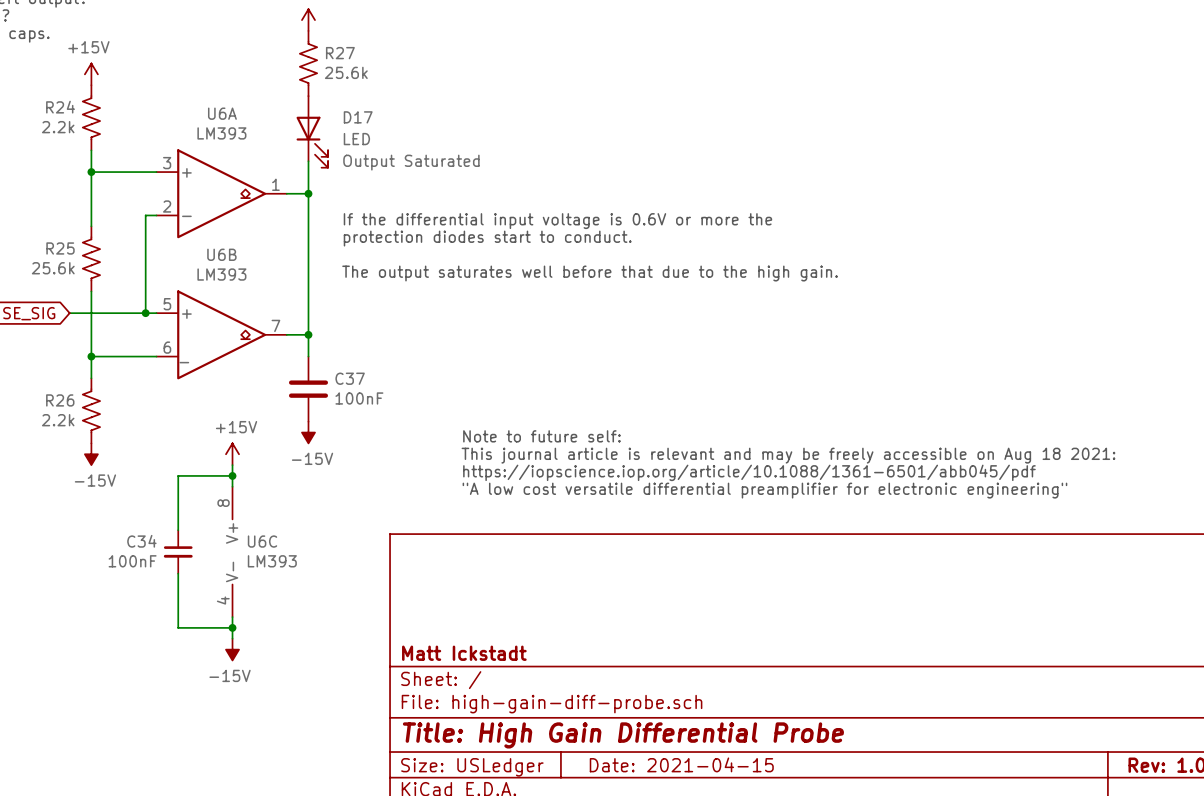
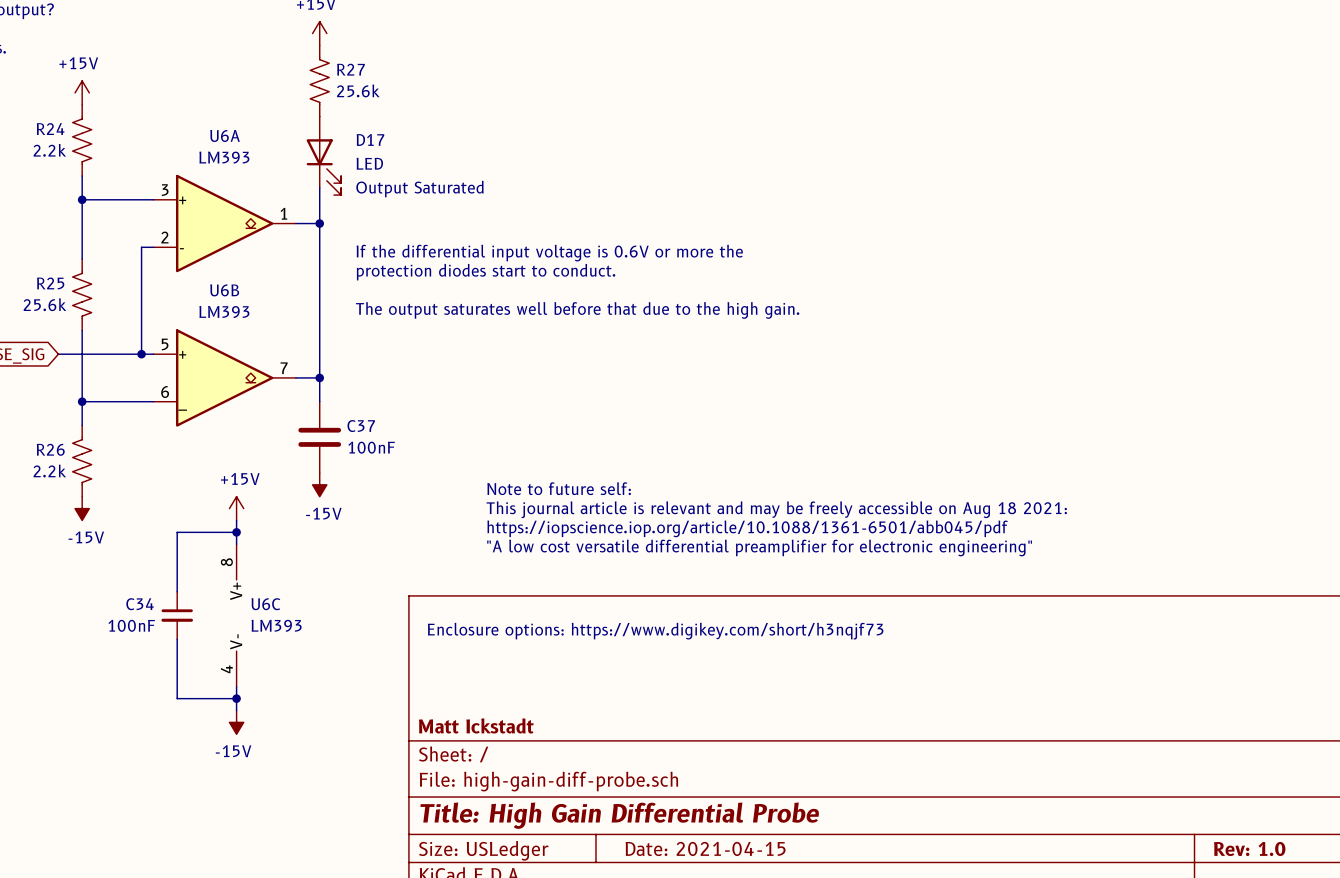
text: none -> Enclosure options: https://www.digikey.com/short/h3nqjf73 (655, 631)

